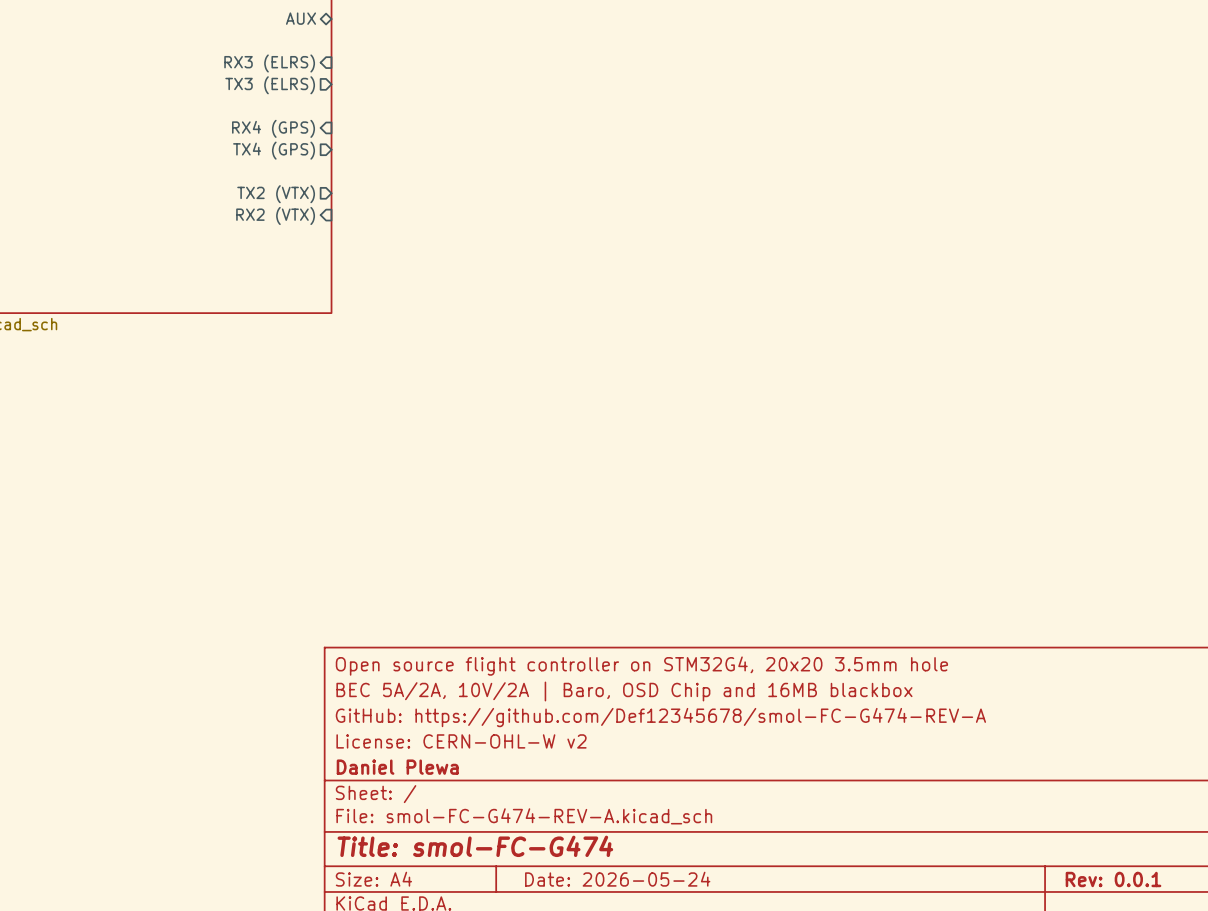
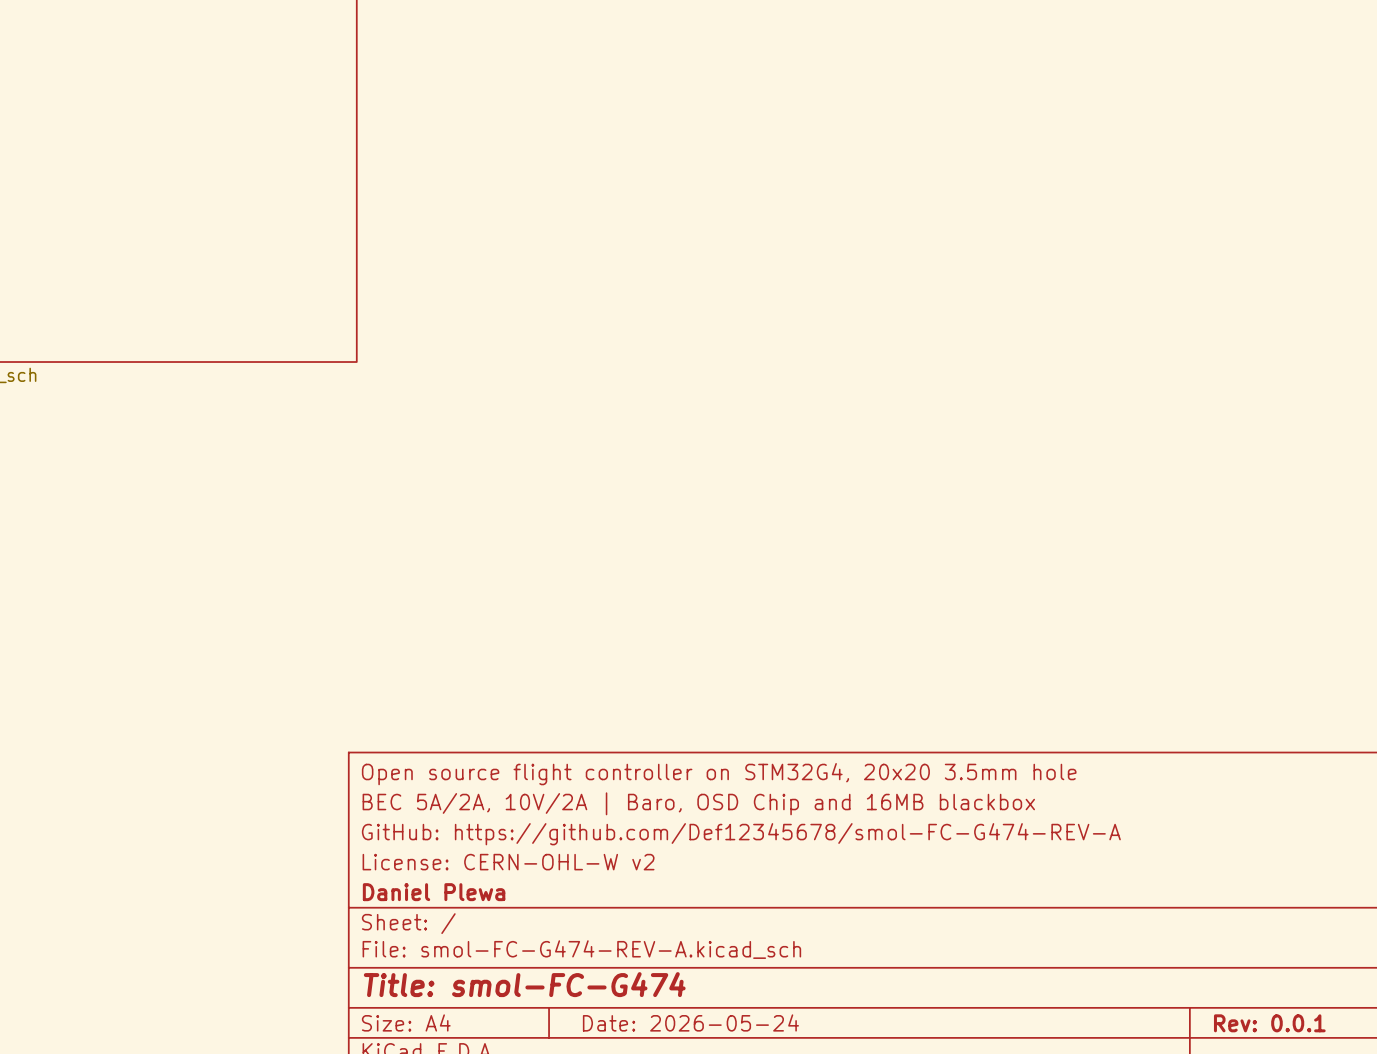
sheet pin: AUX (301, 18) -> none
sheet pin: RX3 (ELRS) (269, 63) -> none
sheet pin: TX3 (ELRS) (270, 85) -> none
sheet pin: RX4 (GPS) (273, 128) -> none
sheet pin: TX4 (GPS) (274, 150) -> none
sheet pin: TX2 (VTX) (276, 194) -> none
sheet pin: RX2 (VTX) (275, 215) -> none

